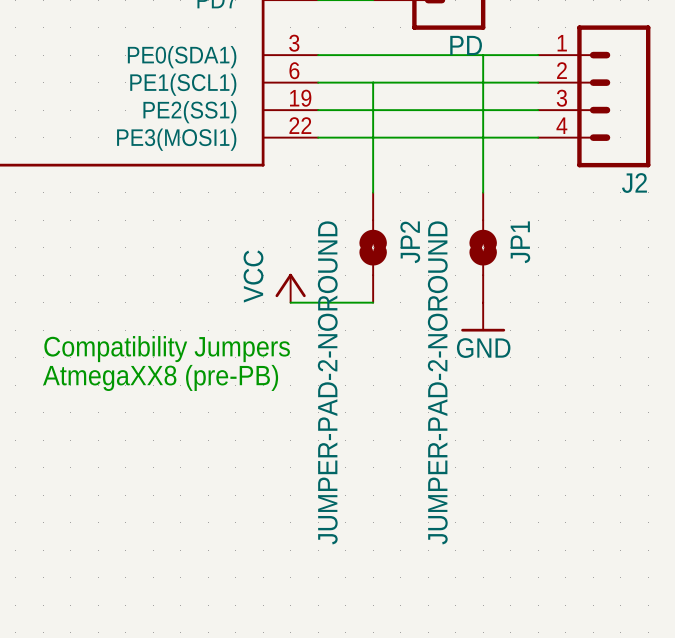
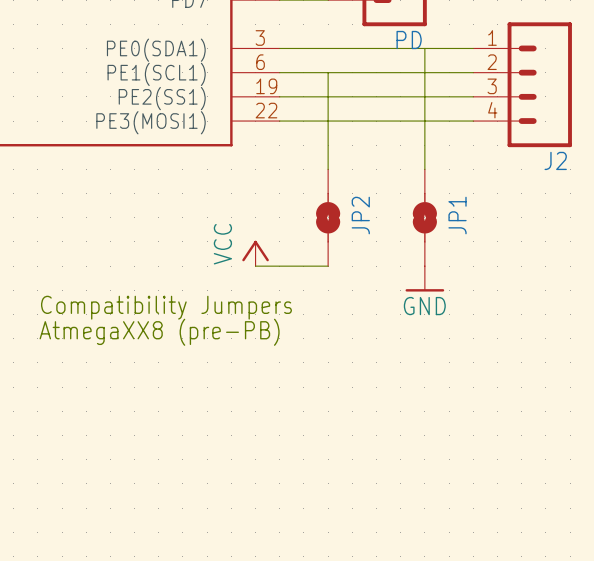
JP2 value: JUMPER-PAD-2-NOROUND (327, 382) -> none
JP1 value: JUMPER-PAD-2-NOROUND (437, 382) -> none

